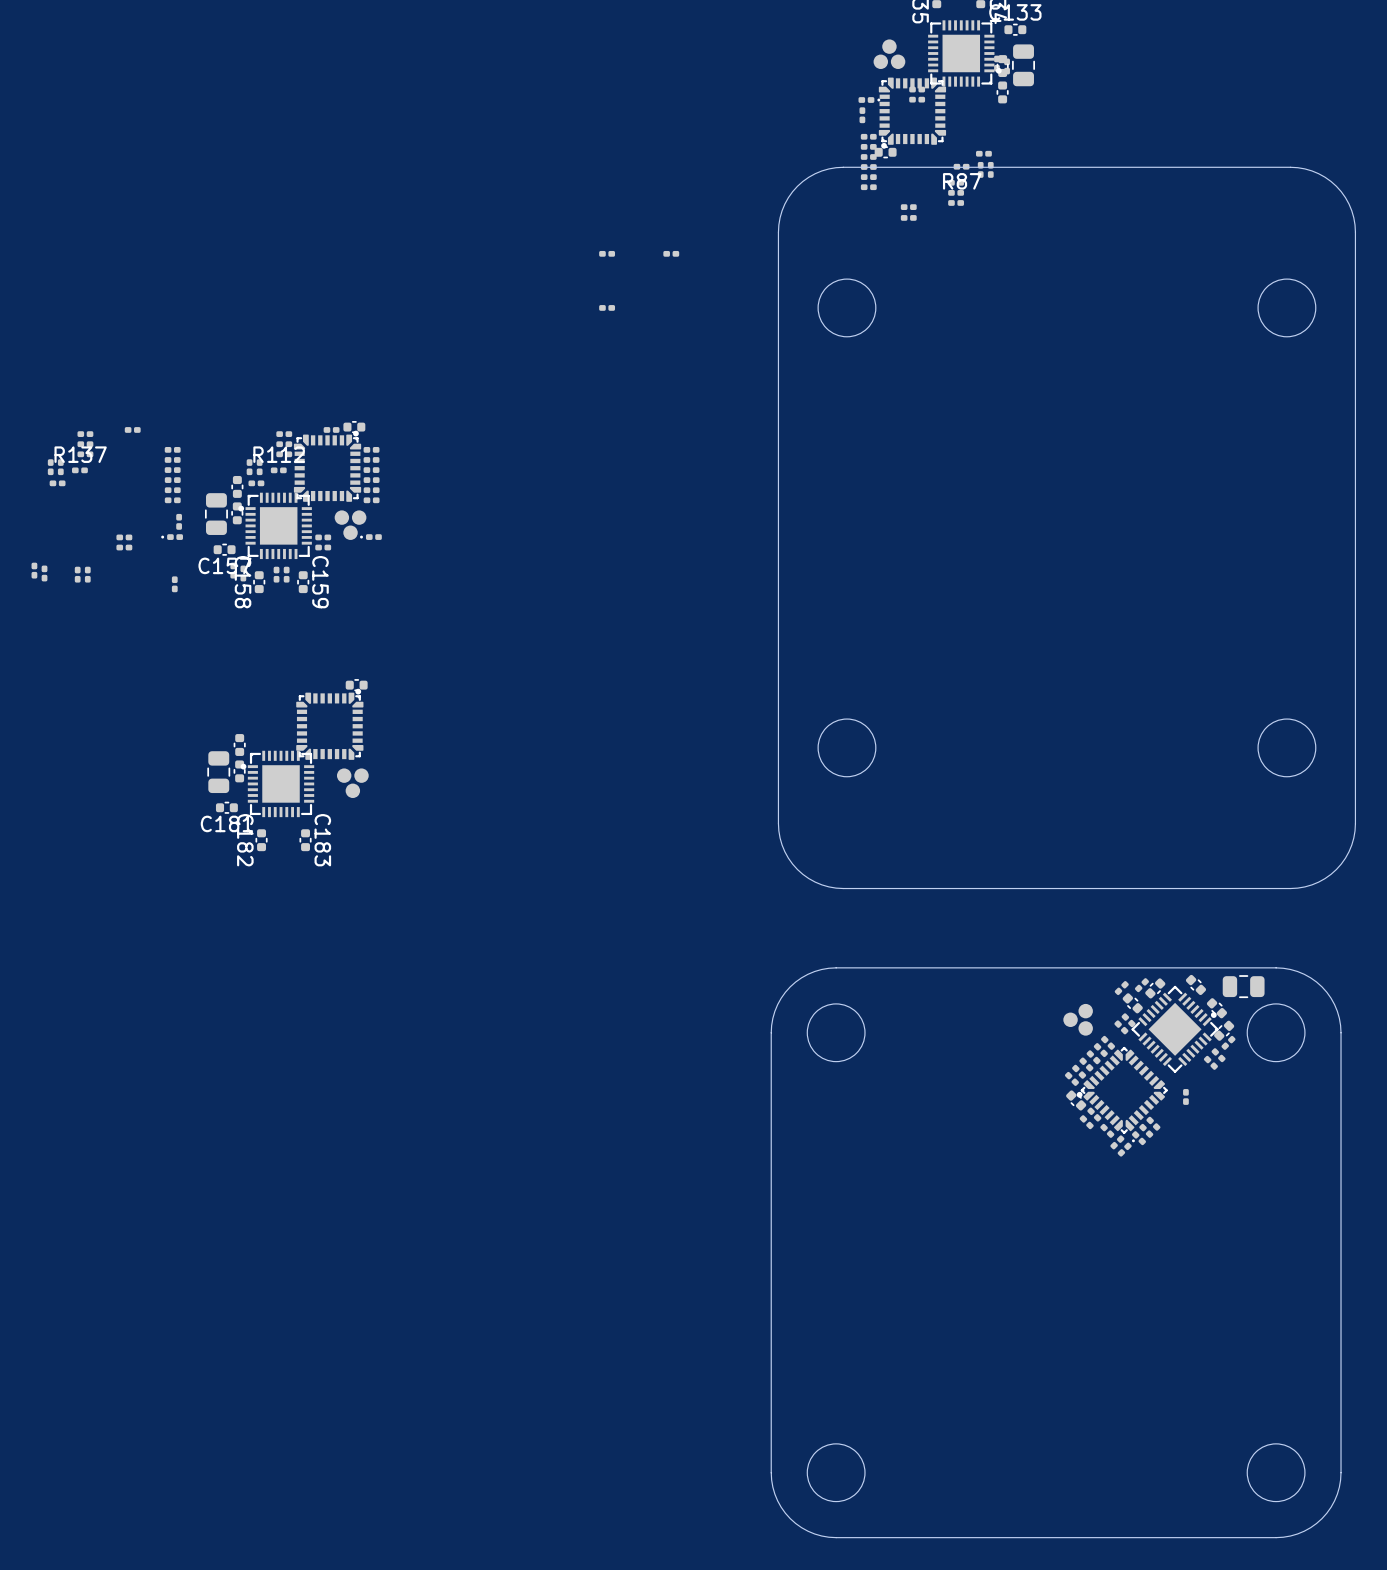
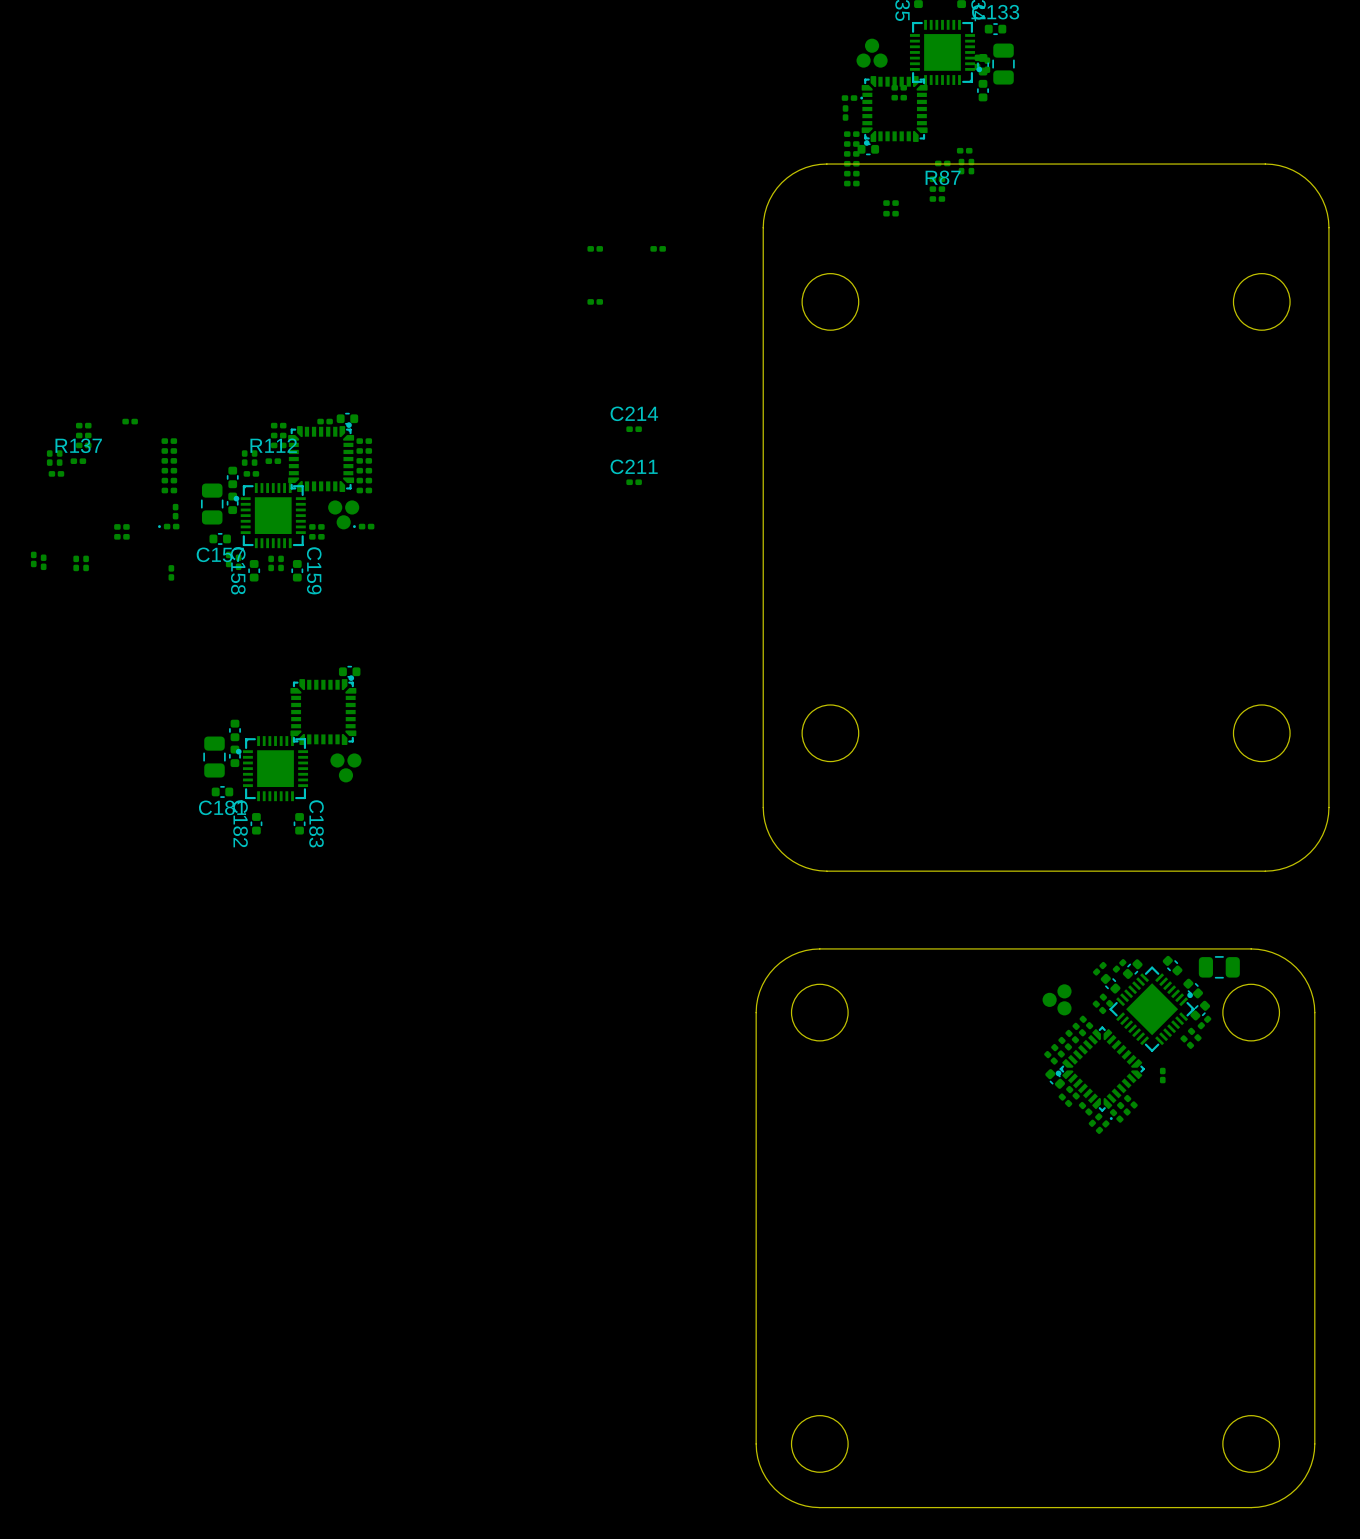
C214: none -> (634, 429)
C211: none -> (634, 482)

